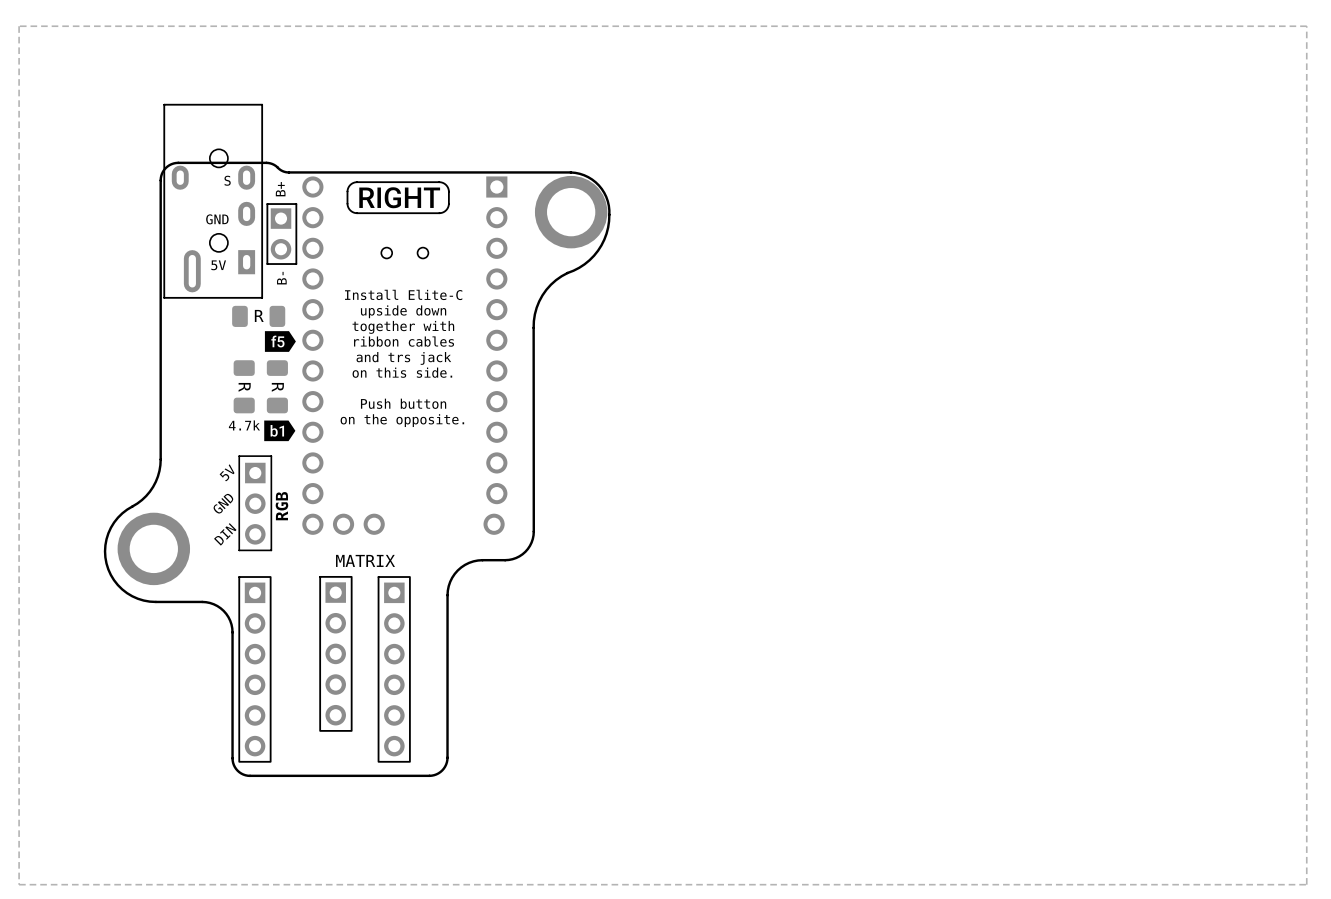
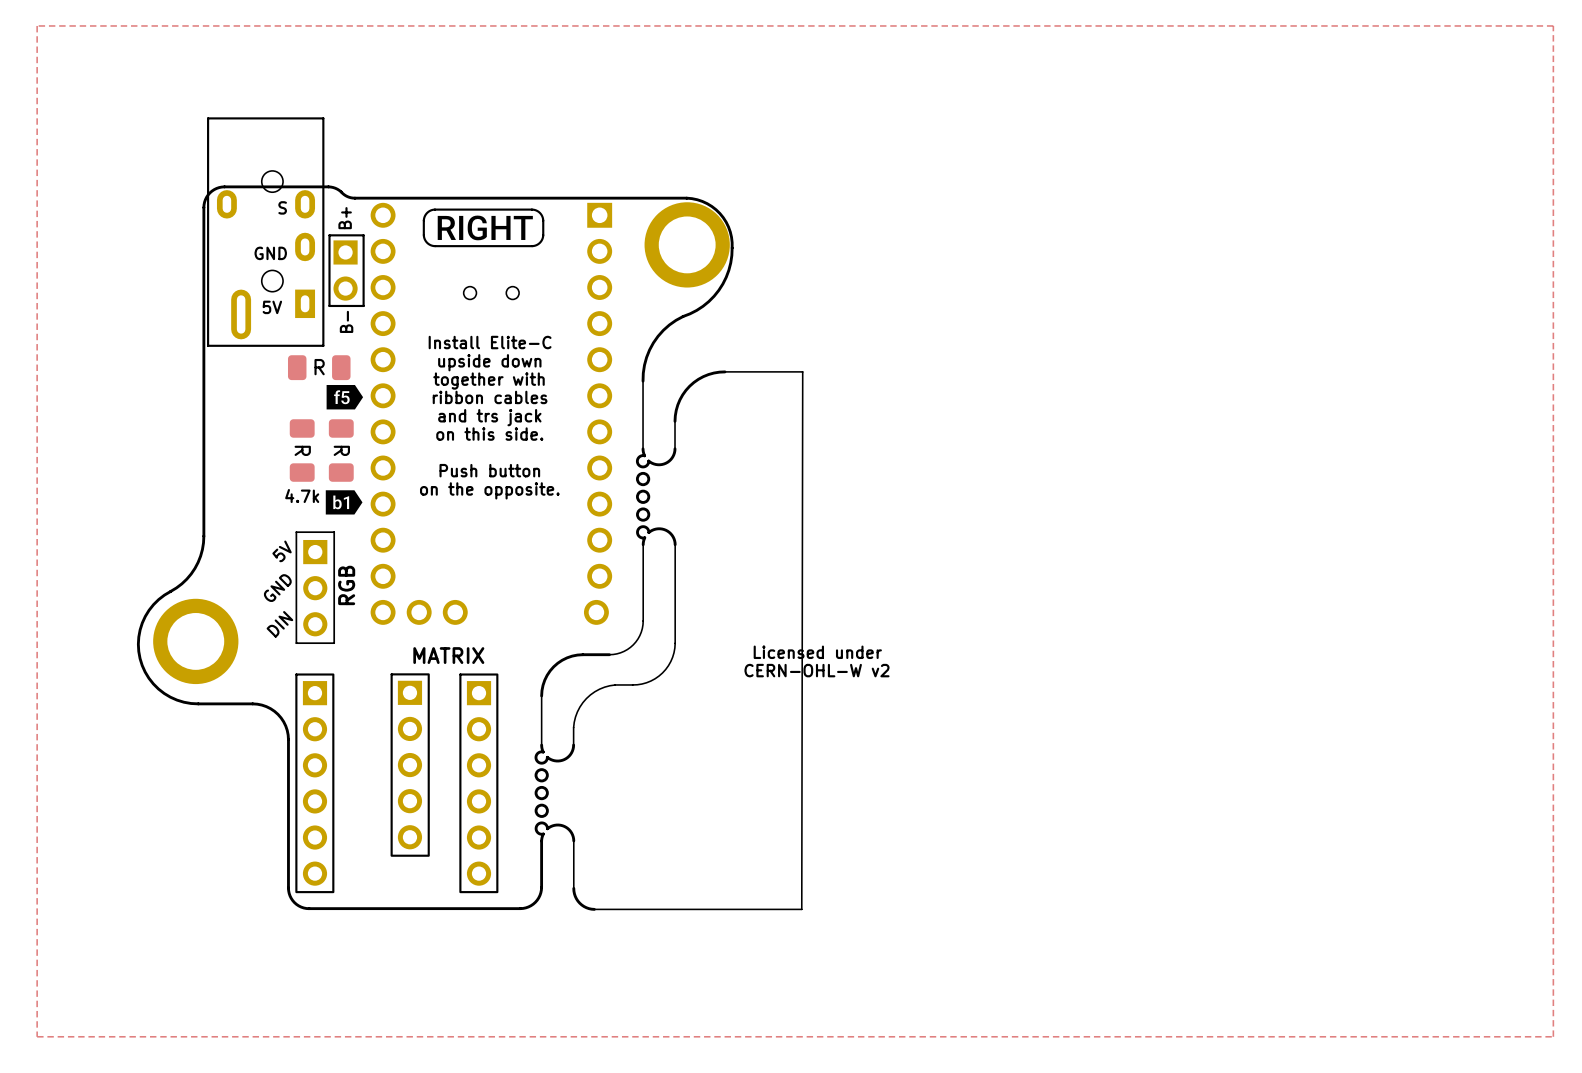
board edge: (533, 327) (533, 535) (525, 551) (516, 558) (505, 560) -> (643, 381) (644, 455) (639, 457) (637, 461) (639, 465) (642, 466) (647, 465) (648, 461) (655, 464) (663, 464) (673, 456) (677, 404) (685, 390) (698, 379) (719, 372) (802, 371) (801, 909) (589, 908) (579, 903) (574, 893) (573, 840) (571, 833) (562, 825) (554, 825) (547, 828) (546, 824) (541, 822) (537, 824) (536, 828) (538, 833) (543, 834) (541, 841) (541, 887)
round board edge: none -> [635, 471, 651, 487]
round board edge: none -> [636, 489, 651, 504]
round board edge: none -> [636, 507, 651, 522]
text: none -> Licensed under (817, 652)
text: none -> CERN-OHL-W v2 (816, 670)
board edge: (447, 595) (447, 757) -> (541, 695) (543, 752) (537, 753) (536, 759) (541, 763) (545, 761) (547, 757) (552, 760) (560, 760) (567, 757) (572, 750) (575, 716) (579, 707) (590, 694) (609, 685) (646, 682) (658, 676) (665, 669) (672, 657) (675, 643) (675, 542) (672, 535) (665, 530) (658, 528) (648, 532) (647, 528) (643, 526) (637, 530) (638, 536) (644, 537) (642, 628) (638, 638) (630, 647) (620, 652) (609, 654)
round board edge: none -> [534, 768, 549, 783]
round board edge: none -> [534, 785, 549, 801]
round board edge: none -> [534, 803, 549, 818]

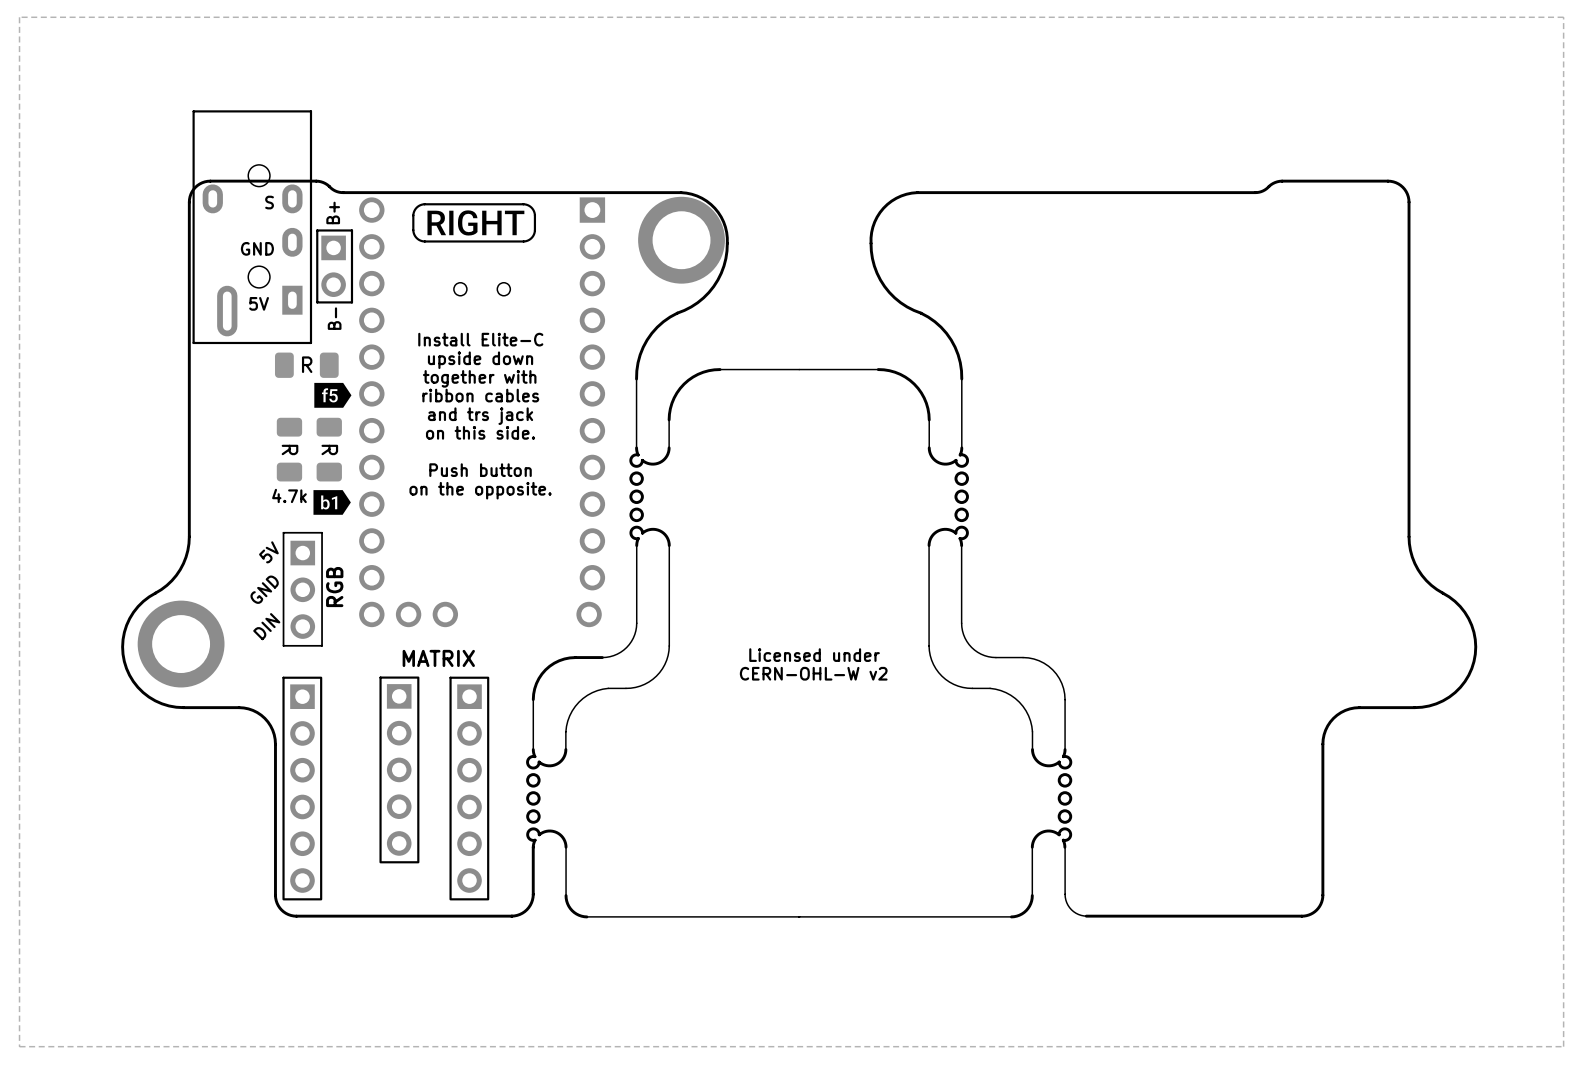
board edge: (802, 371) (801, 909) (594, 909) -> (799, 369) (883, 369) (905, 377) (918, 388) (926, 403) (928, 414) (929, 449) (932, 457) (942, 463) (948, 463) (955, 460) (958, 465) (963, 466) (967, 460) (965, 456) (960, 455) (961, 447) (961, 370) (955, 347) (946, 333) (934, 321) (894, 297) (884, 286) (874, 265) (871, 243) (872, 227) (880, 212) (891, 201) (906, 194) (917, 192) (1257, 192) (1264, 190) (1275, 182) (1282, 181) (1387, 181) (1396, 182) (1402, 187) (1407, 194) (1409, 202) (1409, 543) (1412, 557) (1421, 575) (1431, 585) (1454, 601) (1468, 618) (1475, 639) (1475, 654) (1471, 668) (1464, 681) (1455, 692) (1443, 700) (1422, 707) (1349, 708) (1337, 715) (1327, 725) (1322, 744) (1322, 897) (1320, 904) (1314, 911) (1301, 916)
round board edge: none -> [954, 471, 969, 486]
round board edge: none -> [954, 489, 969, 504]
round board edge: none -> [954, 507, 969, 523]
board edge: none -> (955, 533) (946, 529) (938, 530) (932, 535) (929, 543) (929, 646) (933, 664) (941, 676) (953, 684) (967, 688) (995, 689) (1015, 698) (1026, 710) (1030, 720) (1032, 751) (1035, 759) (1043, 765) (1051, 765) (1059, 762) (1061, 767) (1067, 767) (1070, 761) (1068, 757) (1063, 756) (1065, 749) (1064, 694) (1056, 674) (1048, 666) (1033, 658) (984, 655) (971, 647) (965, 638) (961, 623) (960, 538) (965, 537) (967, 532) (965, 528) (961, 527) (957, 529) (955, 533)
round board edge: none -> [1057, 773, 1073, 788]
round board edge: none -> [1057, 791, 1073, 806]
round board edge: none -> [1057, 809, 1073, 824]
board edge: none -> (1064, 847) (1063, 840) (1068, 839) (1070, 835) (1066, 829) (1061, 829) (1059, 834) (1047, 831) (1039, 833) (1035, 837) (1032, 847) (1031, 901) (1024, 912) (1011, 916)
board edge: none -> (1065, 847) (1065, 900) (1073, 911) (1086, 916)
board edge: none -> (1086, 916) (1301, 916)
board edge: none -> (588, 916) (1009, 916)

